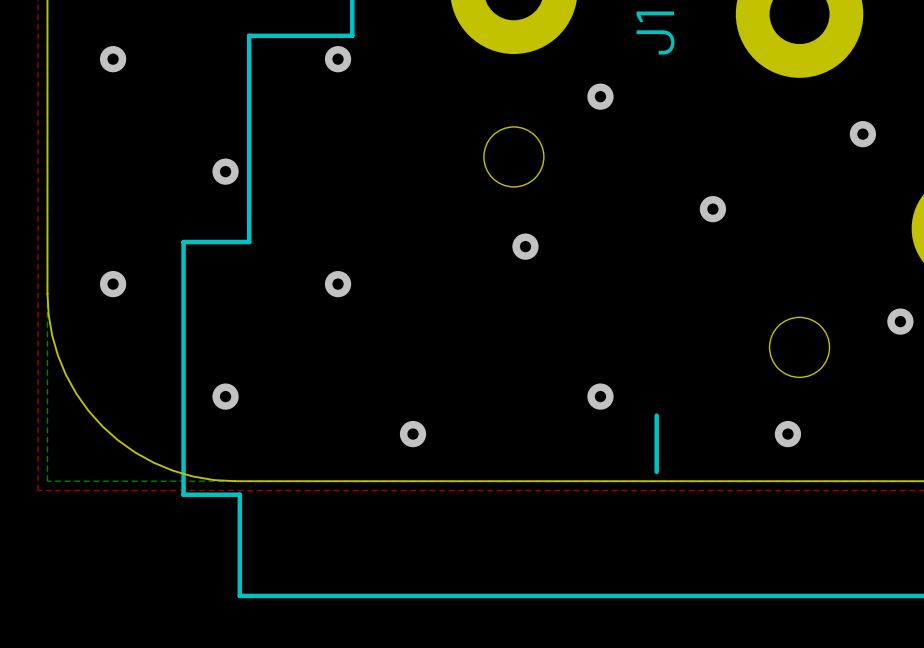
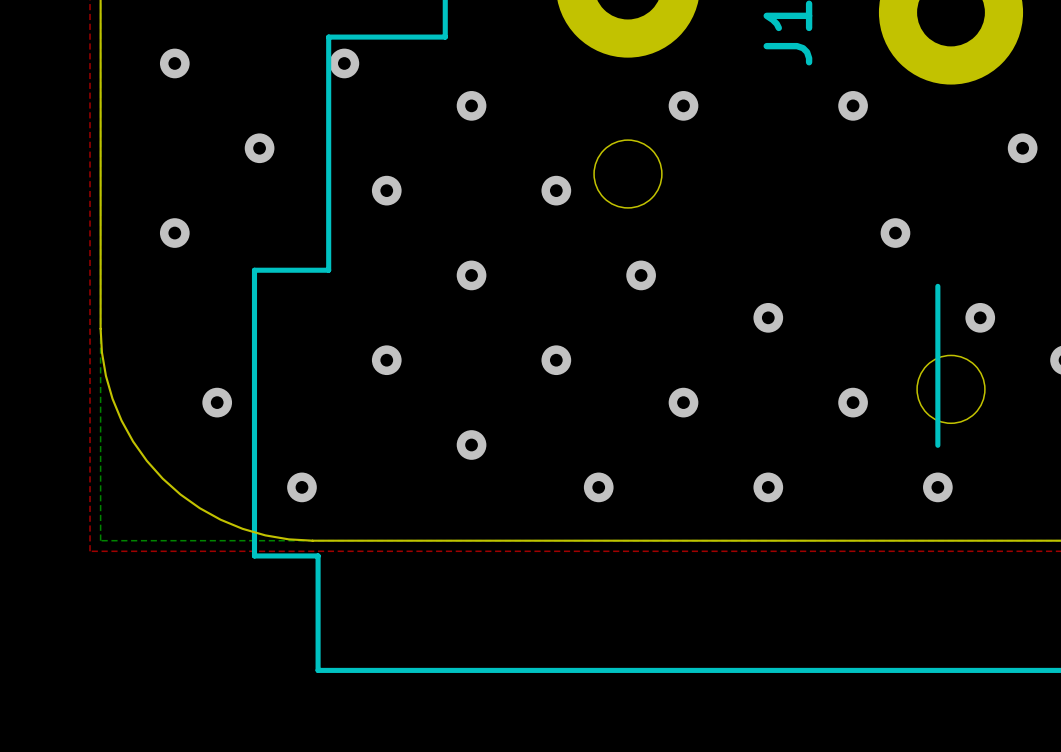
via: none -> (344, 63)
via: (338, 59) -> none
via: none -> (471, 105)
via position: (600, 96) -> (683, 105)
via: none -> (853, 105)
via: none -> (259, 148)
via: (225, 171) -> none
via: none -> (386, 190)
via: none -> (556, 190)
via: none -> (174, 233)
via position: (712, 209) -> (895, 233)
via: none -> (471, 275)
line: none -> (937, 286) (937, 445)
via: (113, 284) -> none
via: (338, 284) -> none
via: none -> (768, 317)
via: none -> (980, 317)
via: none -> (386, 360)
via: none -> (556, 360)
via: none -> (217, 402)
via: none -> (683, 402)
via: none -> (853, 402)
via position: (225, 396) -> (301, 487)
via: none -> (471, 445)
via: (600, 396) -> none
line: (656, 415) (656, 471) -> none
via: (413, 434) -> none
via: none -> (598, 487)
via: none -> (768, 487)

